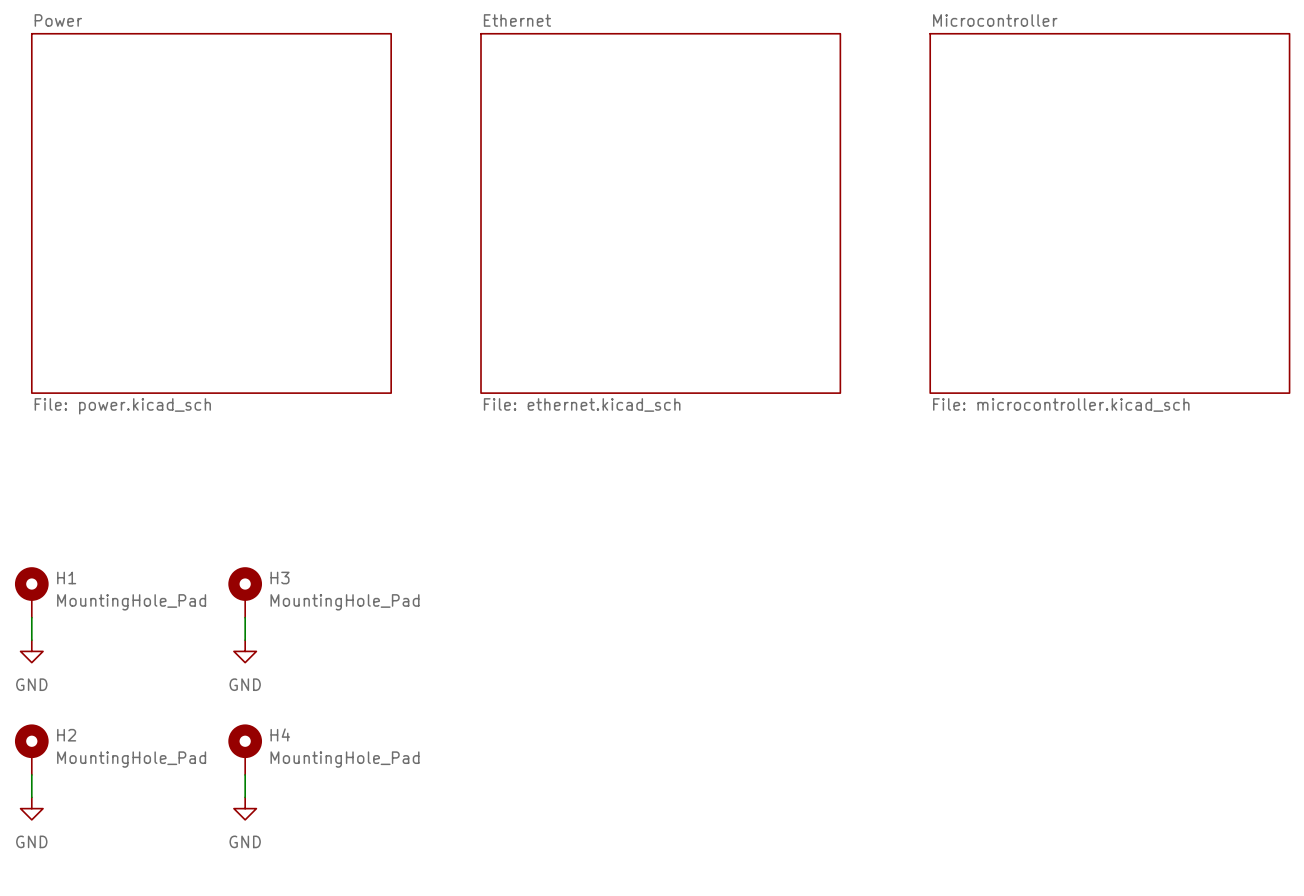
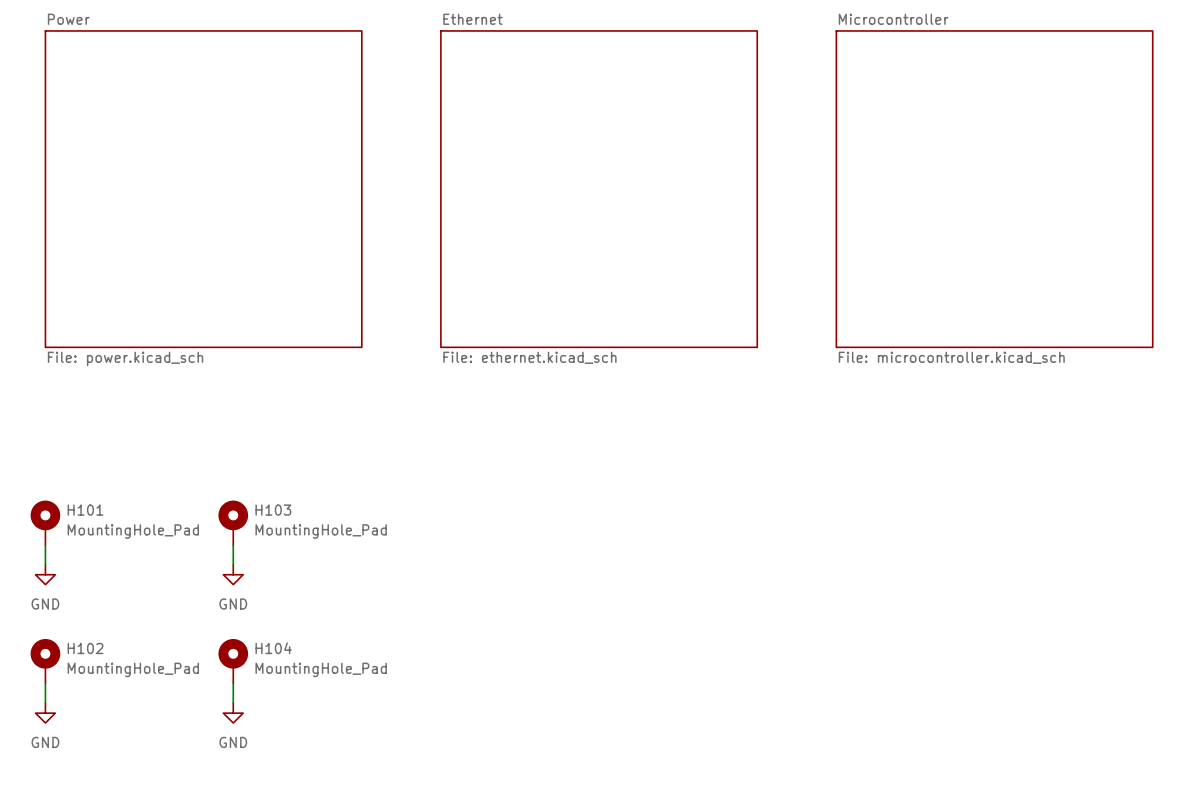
H1 name: H1 (66, 577) -> H101 (85, 510)
H3 name: H3 (280, 577) -> H103 (273, 510)
H4 name: H4 (280, 734) -> H104 (273, 648)
H2 name: H2 (66, 735) -> H102 (85, 648)

